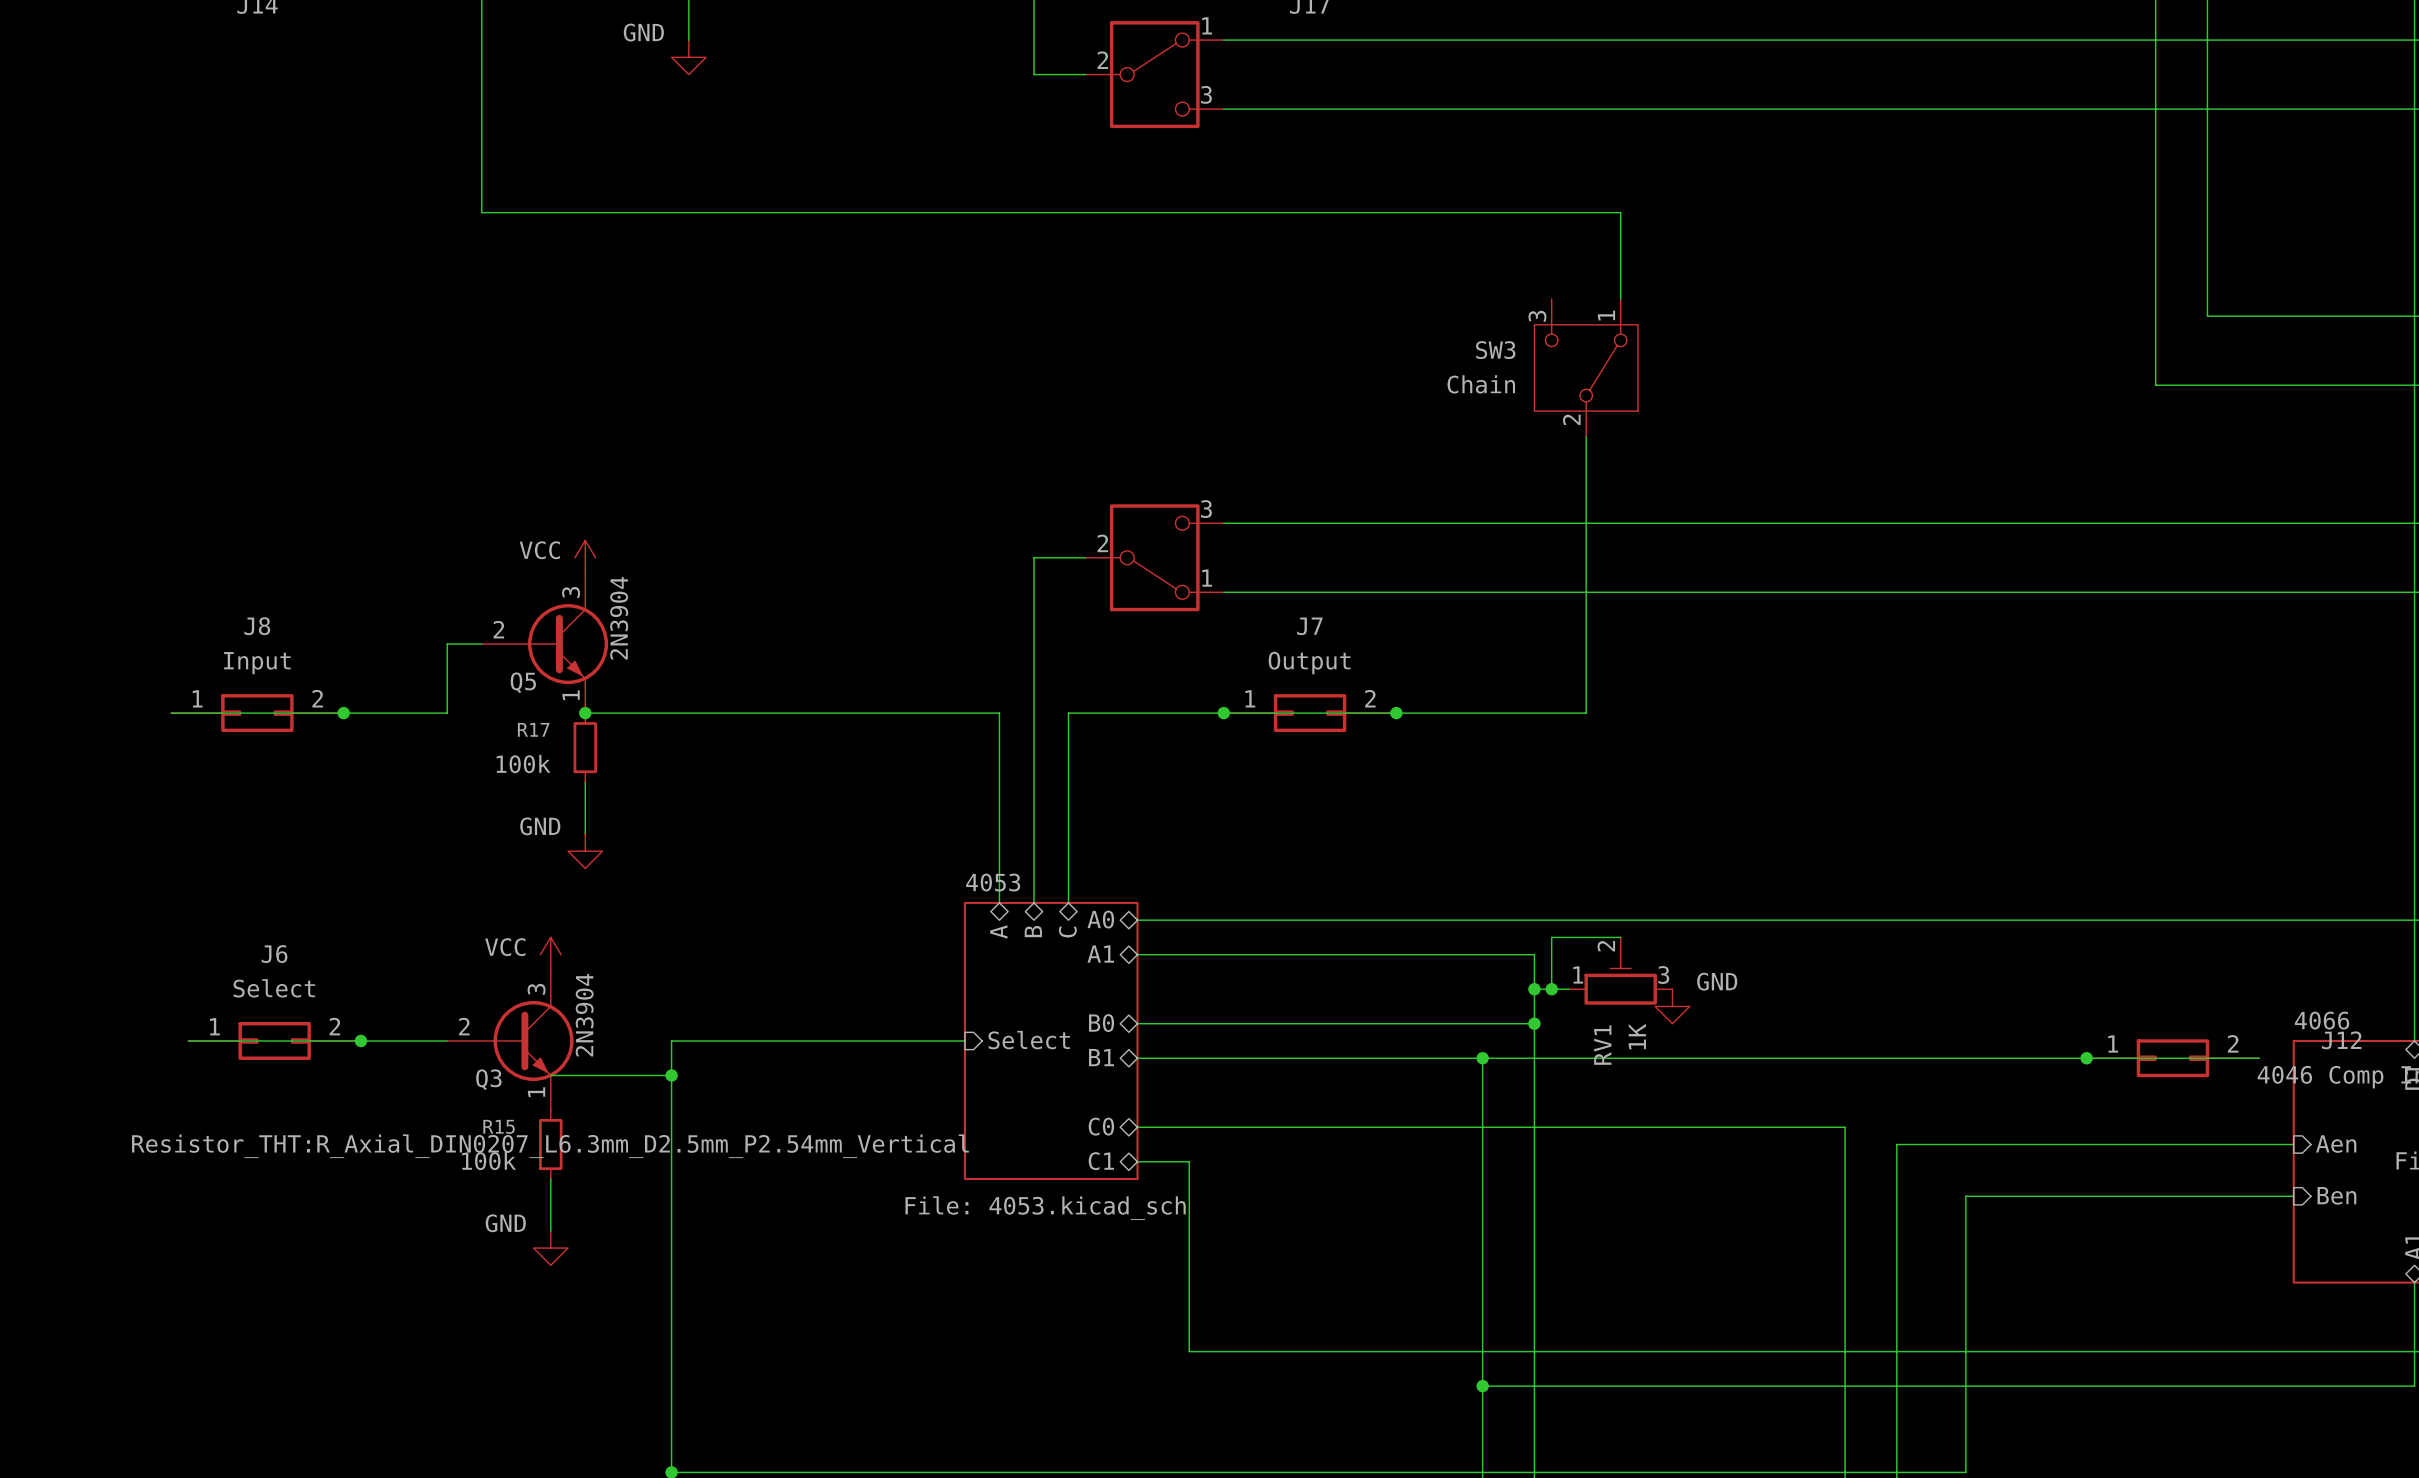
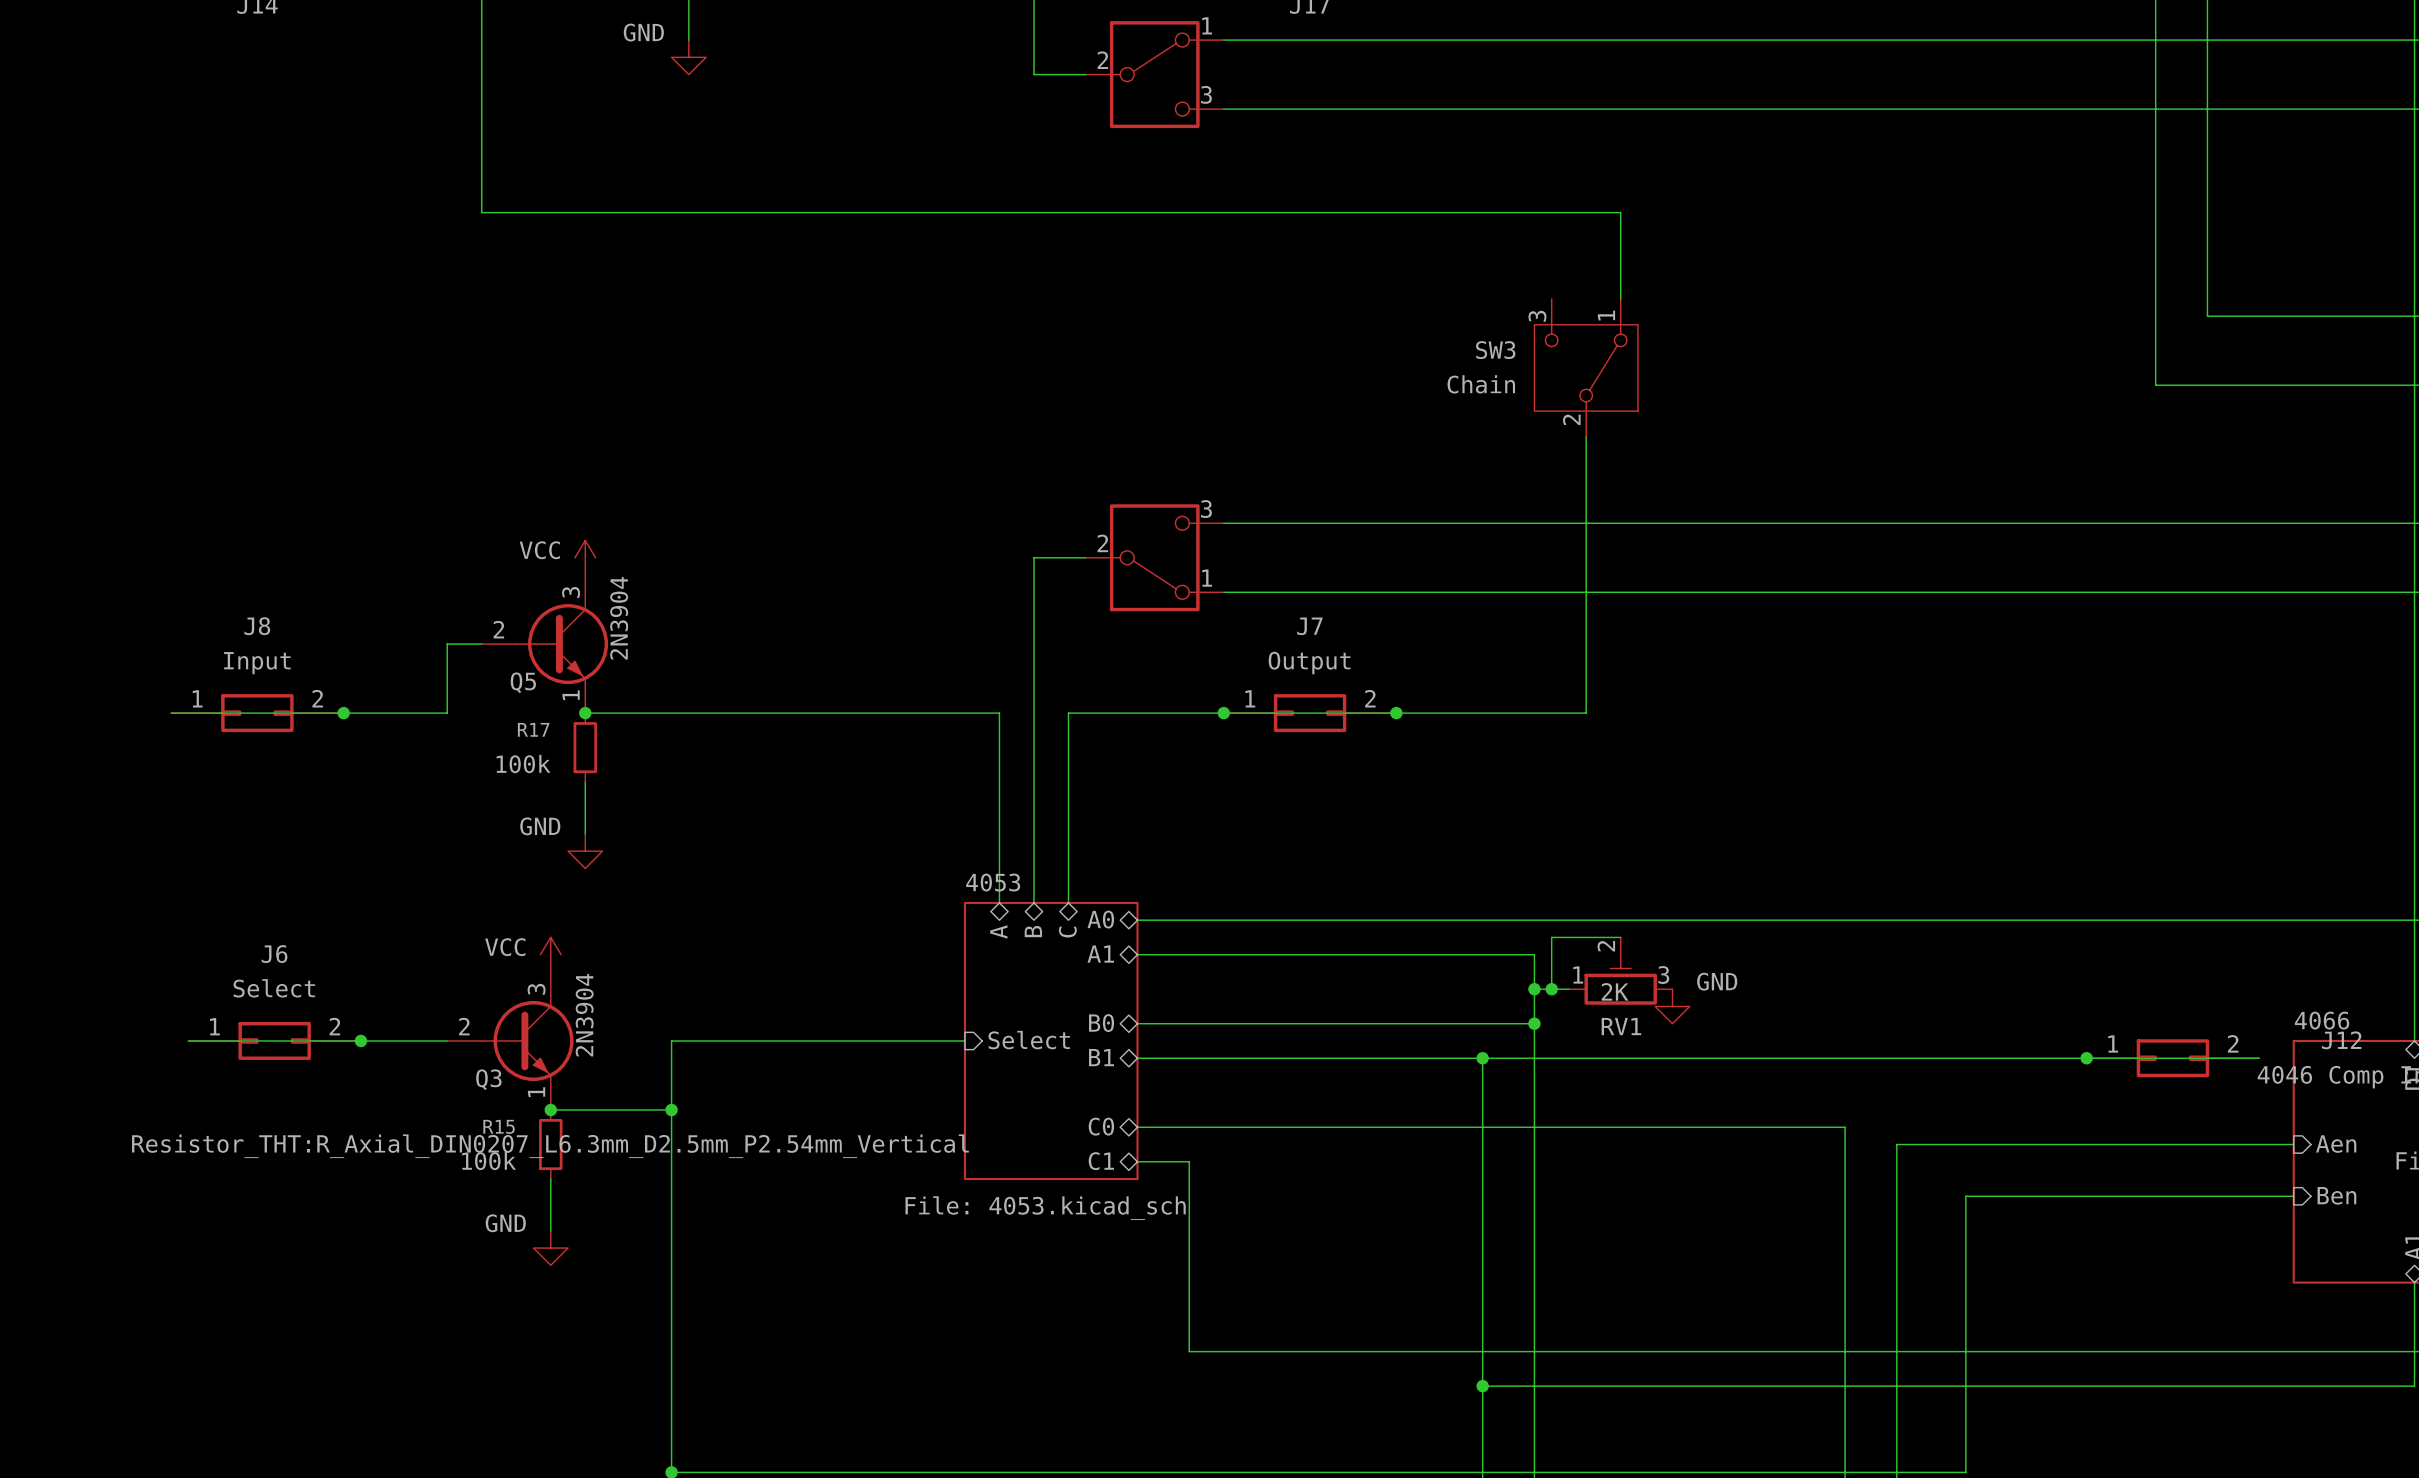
RV1 value: 1K (1637, 1036) -> 2K (1615, 991)
RV1 name rotation: 0° (1602, 1045) -> 90° clockwise (1621, 1026)
wire: (550, 1075) (671, 1075) -> (550, 1110) (671, 1110)
junction position: (671, 1075) -> (671, 1110)
junction: none -> (550, 1110)

